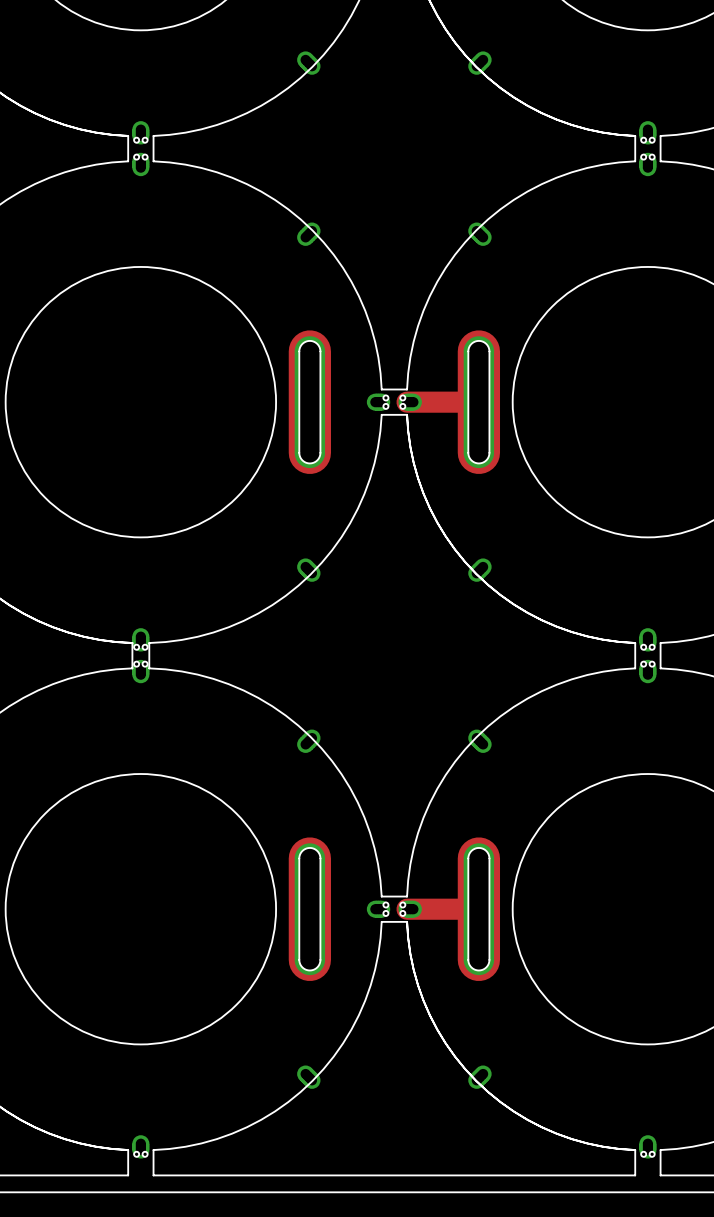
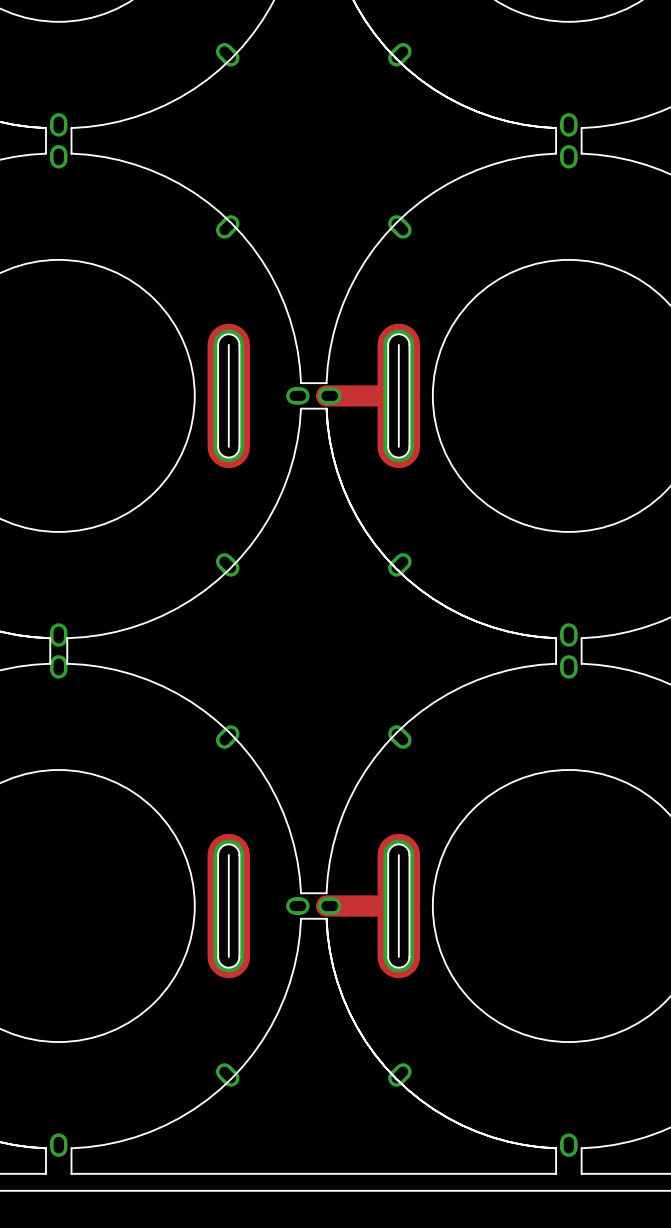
hole: (136, 140) -> none
hole: (145, 140) -> none
hole: (643, 140) -> none
hole: (652, 140) -> none
hole: (136, 157) -> none
hole: (145, 157) -> none
hole: (643, 157) -> none
hole: (652, 157) -> none
board edge: none -> (228, 344) (228, 446)
board edge: none -> (398, 344) (398, 446)
hole: (385, 397) -> none
hole: (402, 397) -> none
hole: (385, 406) -> none
hole: (402, 406) -> none
hole: (136, 647) -> none
hole: (145, 647) -> none
hole: (643, 647) -> none
hole: (652, 647) -> none
hole: (136, 664) -> none
hole: (145, 664) -> none
hole: (643, 664) -> none
hole: (652, 664) -> none
board edge: none -> (228, 855) (228, 957)
board edge: none -> (398, 855) (398, 957)
hole: (385, 904) -> none
hole: (402, 904) -> none
hole: (385, 913) -> none
hole: (402, 913) -> none
hole: (136, 1154) -> none
hole: (145, 1154) -> none
hole: (643, 1154) -> none
hole: (652, 1154) -> none

